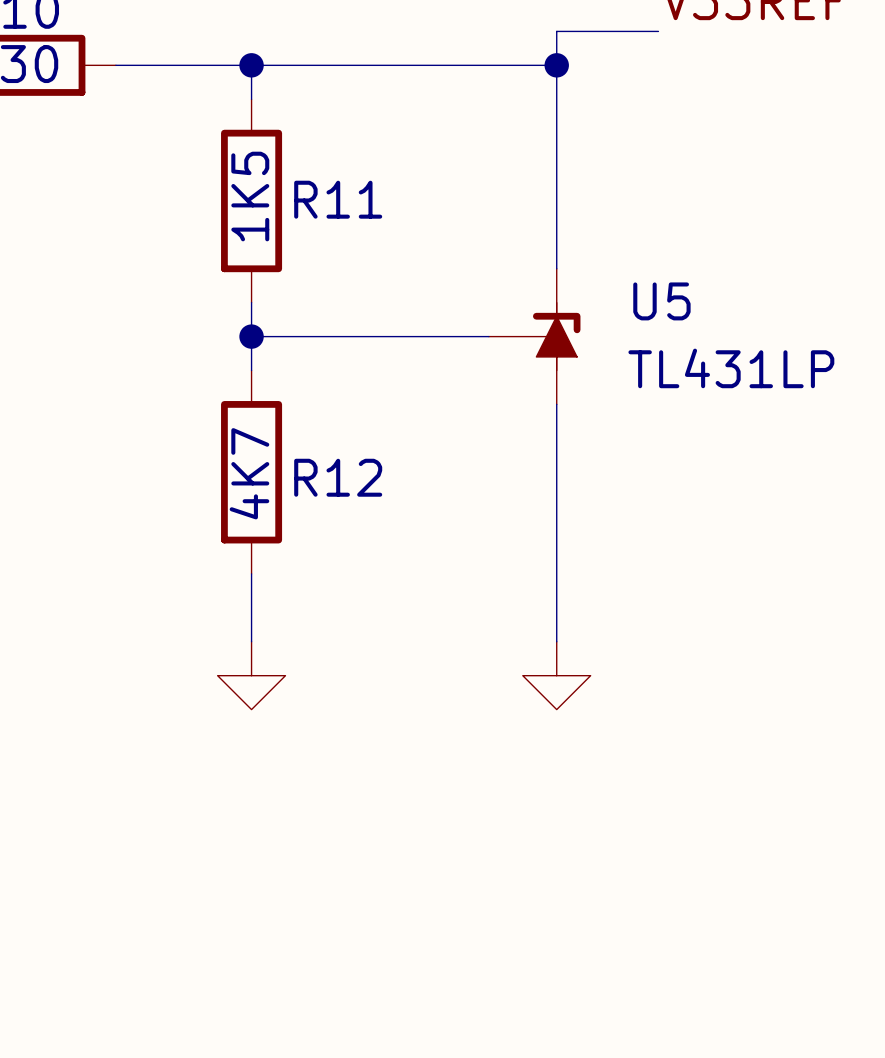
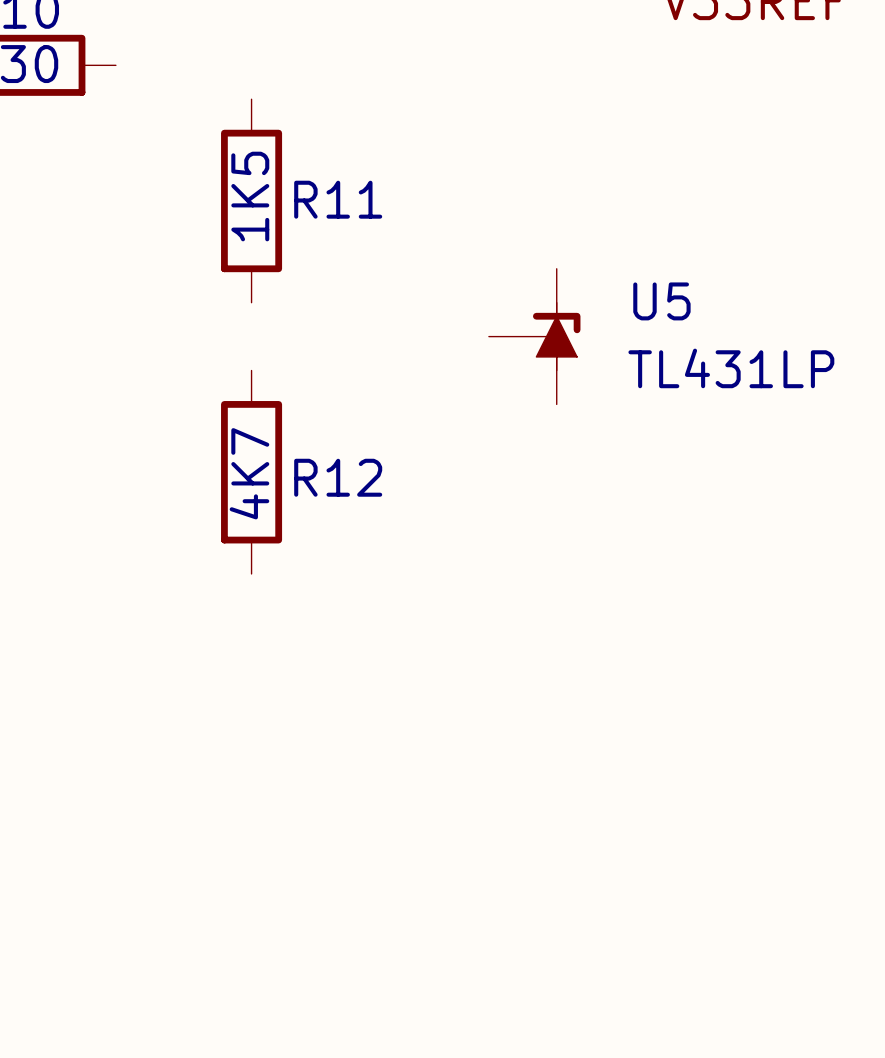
wire: (658, 31) (556, 31) (556, 268) -> none
wire: (115, 65) (556, 65) -> none
wire: (251, 65) (251, 99) -> none
junction: (251, 65) -> none
junction: (556, 65) -> none
wire: (251, 302) (251, 370) -> none
wire: (251, 336) (488, 336) -> none
junction: (251, 336) -> none
wire: (556, 404) (556, 641) -> none
wire: (251, 573) (251, 641) -> none
power symbol: (251, 675) -> none
power symbol: (556, 675) -> none

